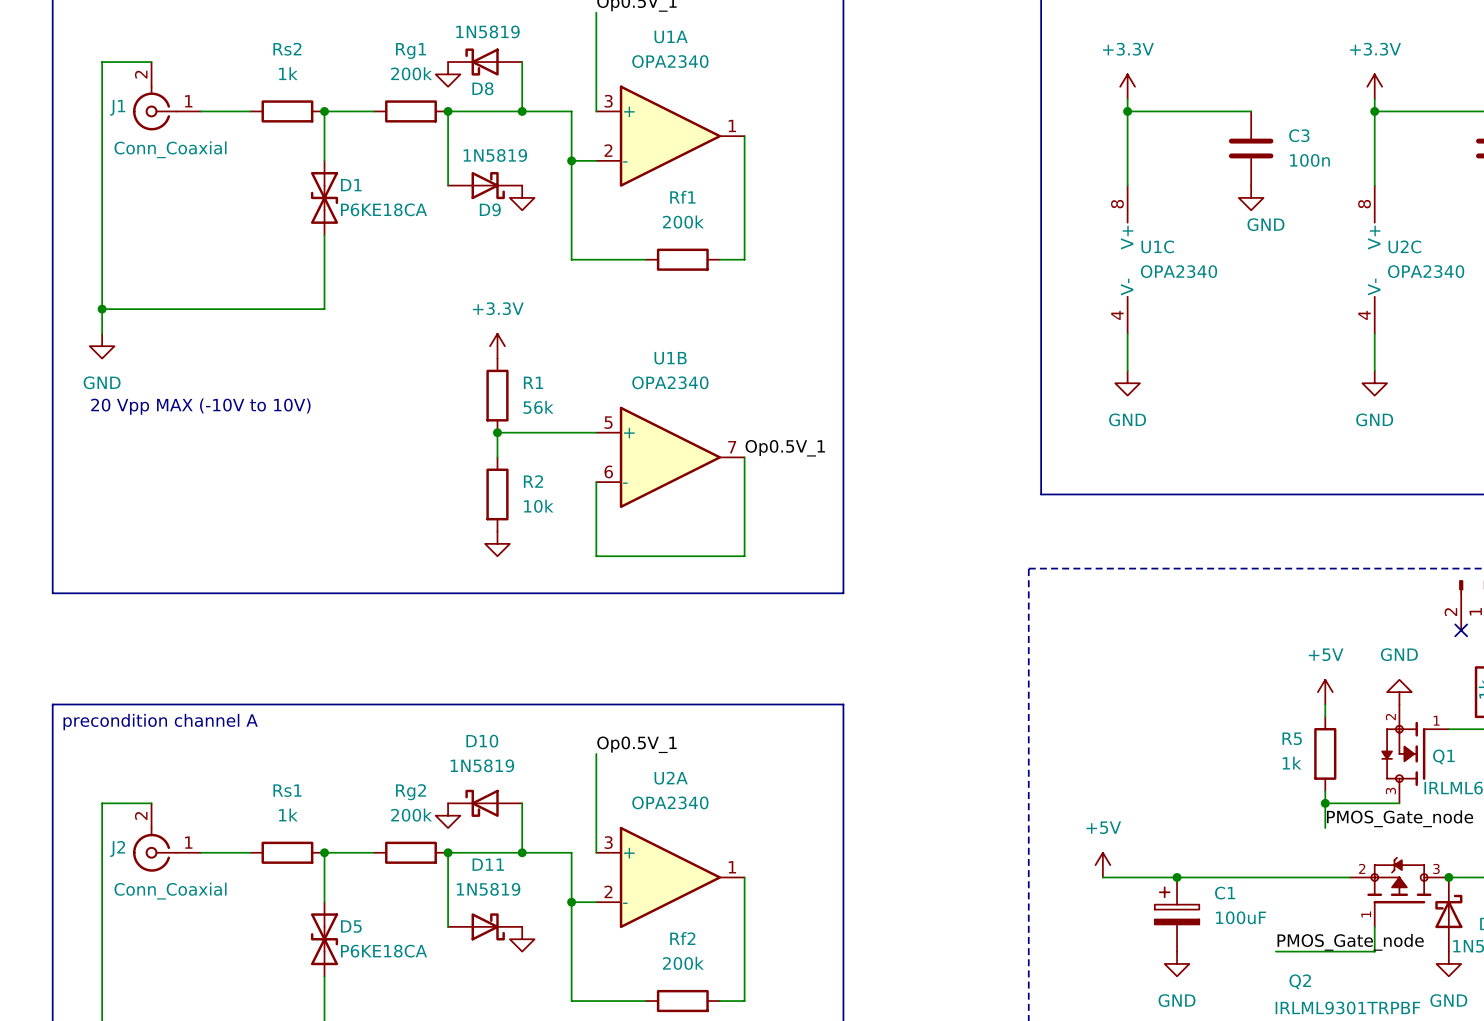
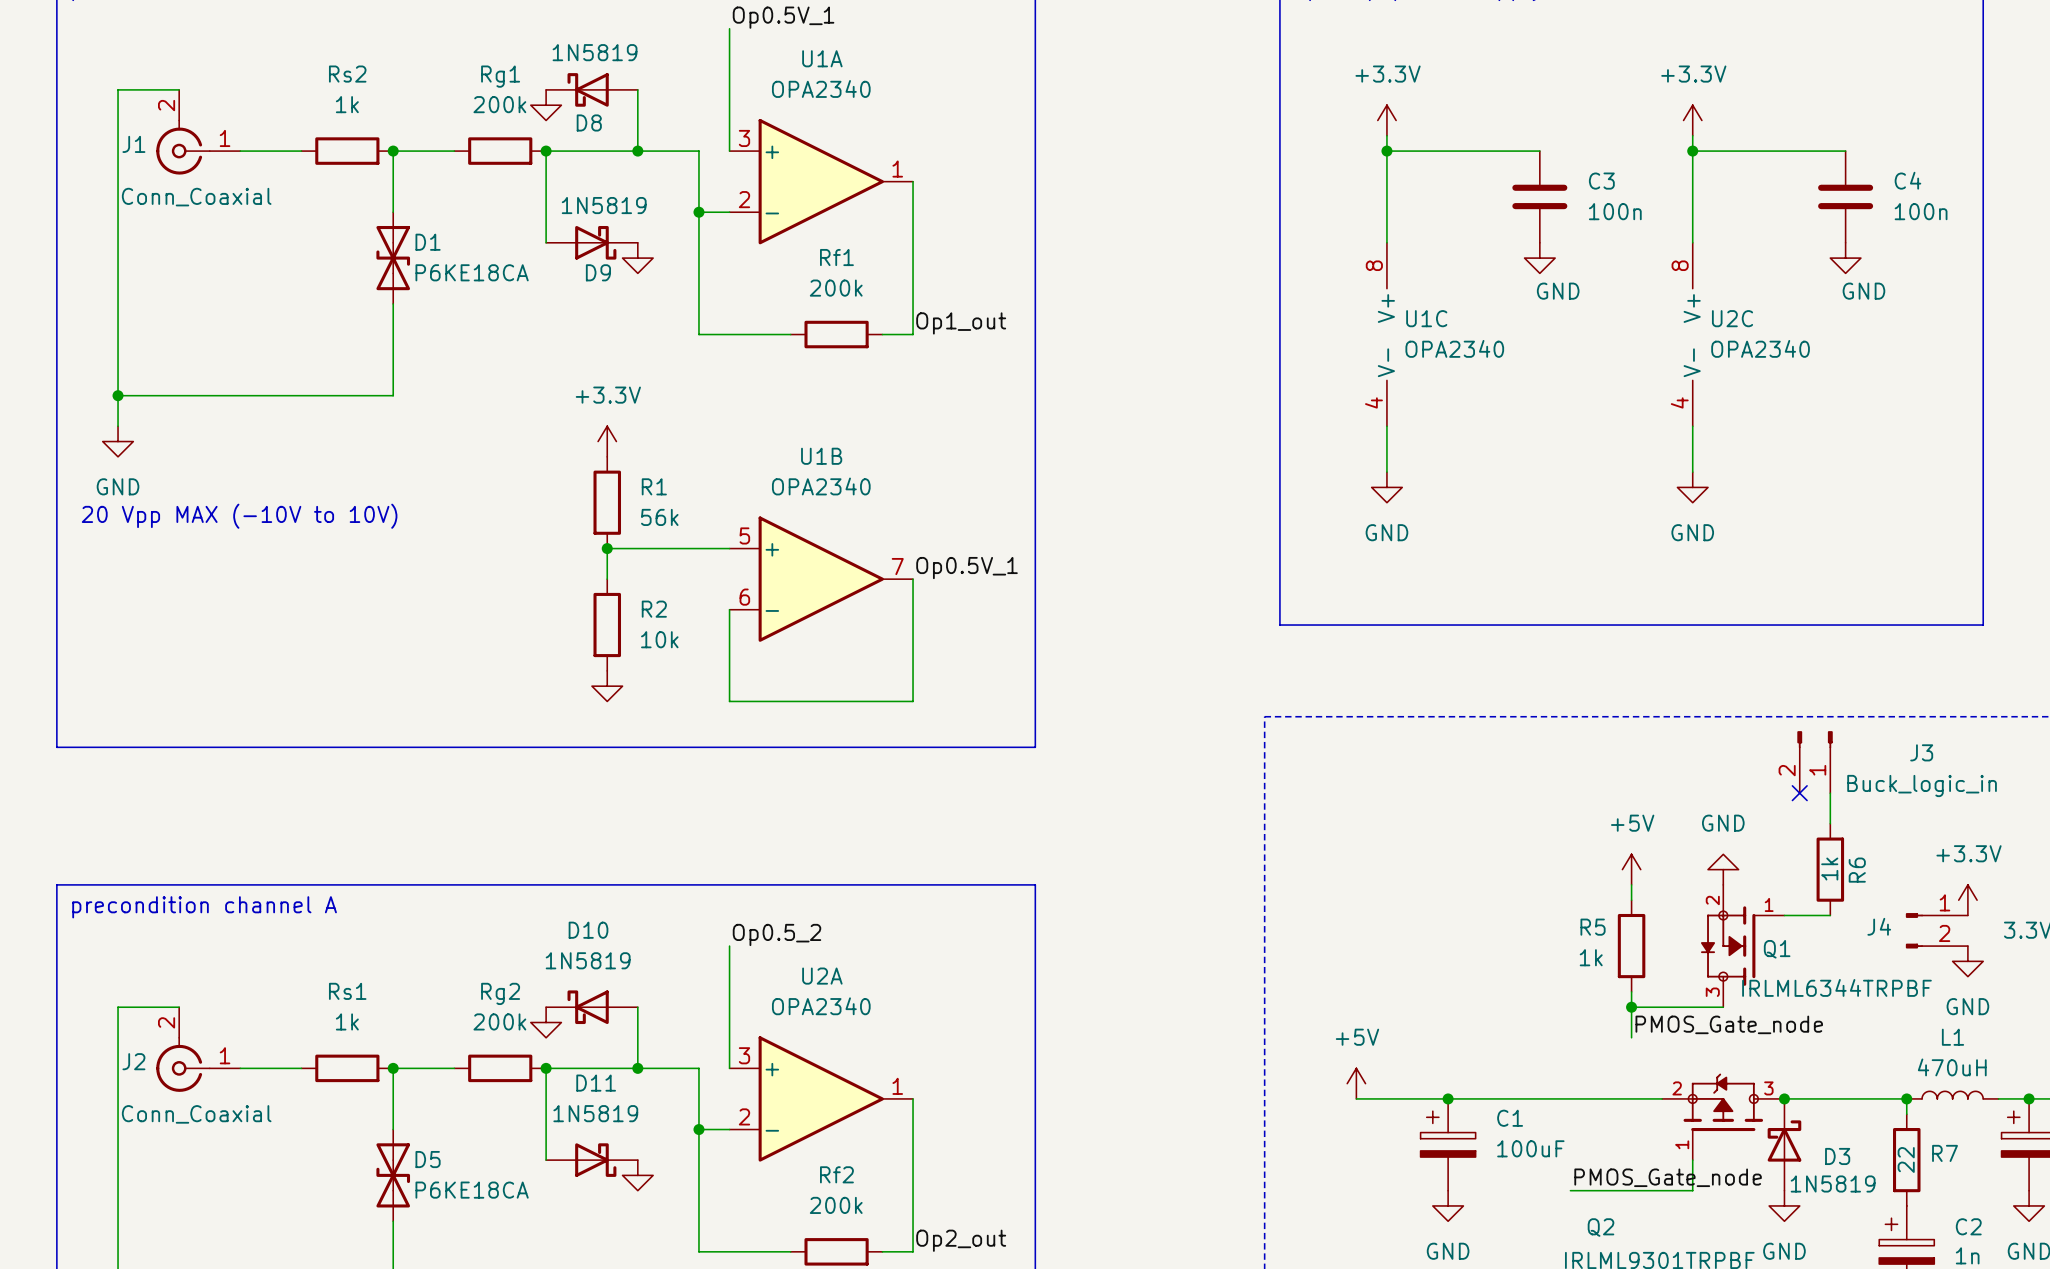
label: none -> Op1_out (961, 323)
label: Op0.5V_1 (636, 744) -> Op0.5_2 (776, 934)
label: none -> Op2_out (961, 1240)

